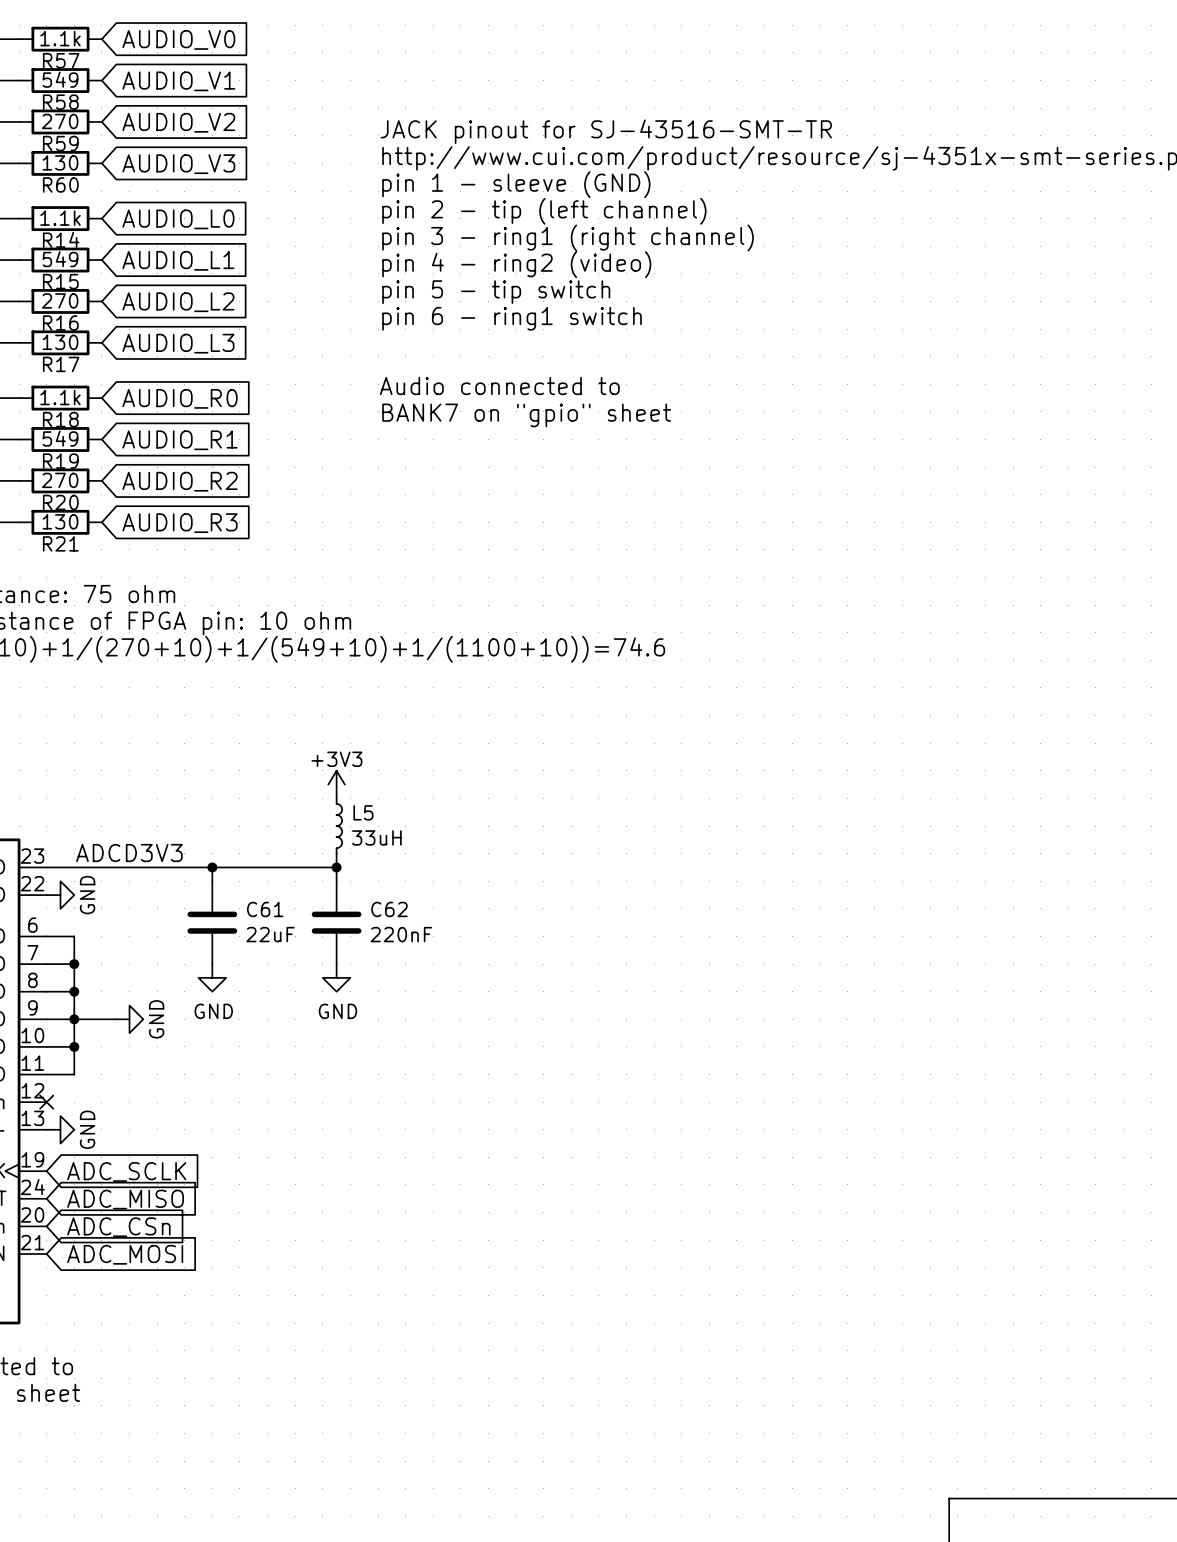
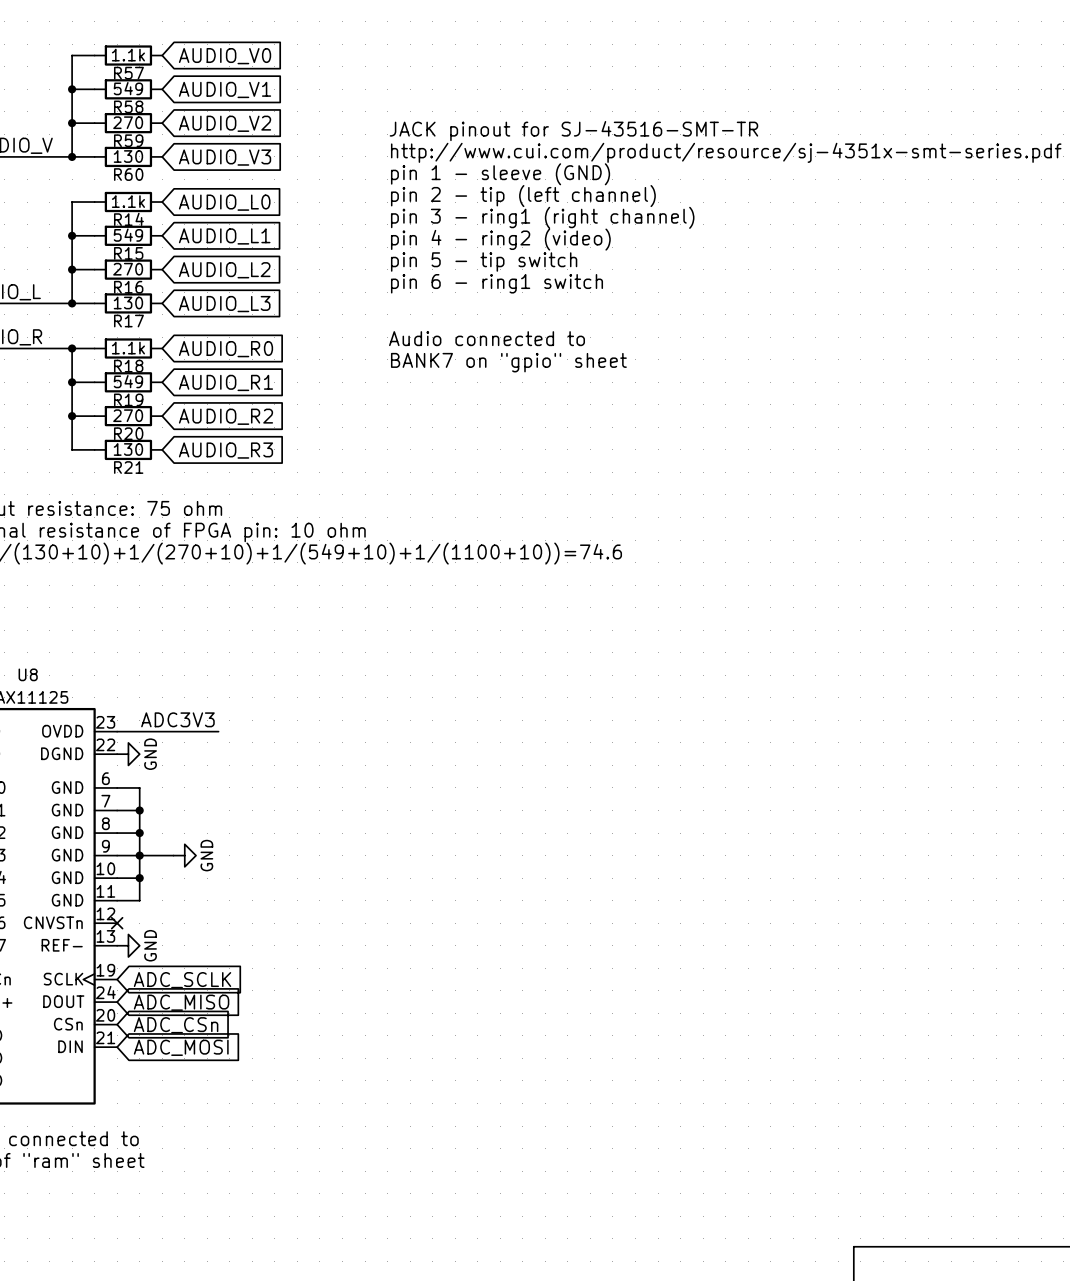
power symbol: +3V3 (336, 784) -> none
L5: 33uH (339, 826) -> none
label: ADCD3V3 (129, 853) -> ADC3V3 (177, 719)
wire: (336, 853) (336, 881) -> none
wire: (170, 867) (336, 867) -> none
wire: (212, 867) (212, 881) -> none
junction: (212, 867) -> none
junction: (336, 867) -> none
C61: 22uF (212, 922) -> none
C62: 220nF (336, 922) -> none
power symbol: GND (212, 977) -> none
power symbol: GND (336, 977) -> none

